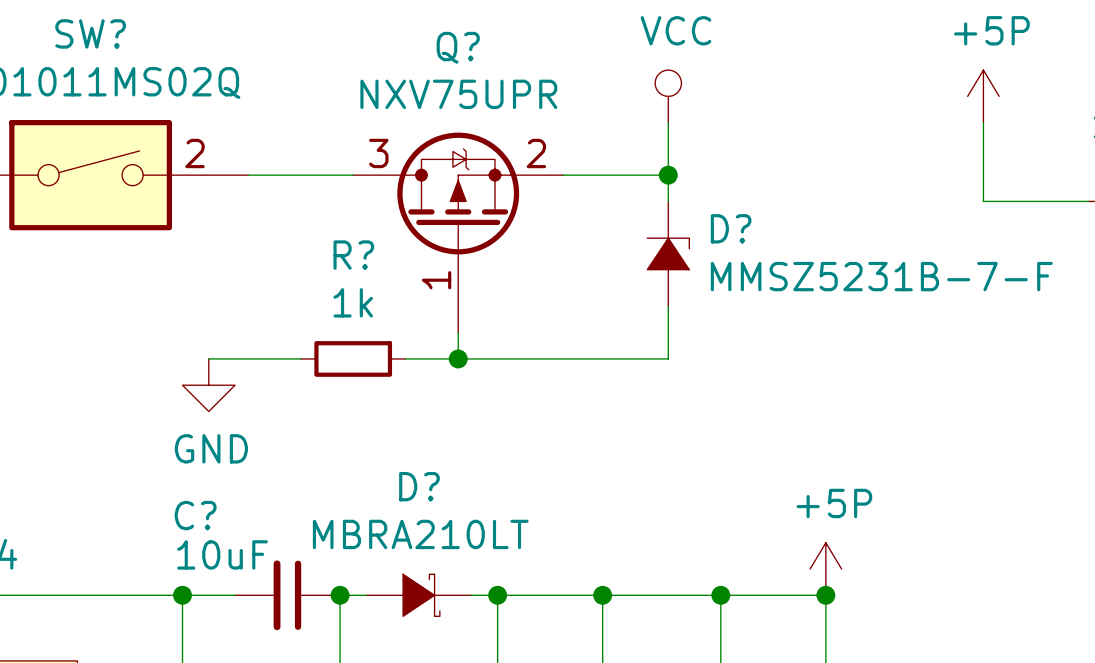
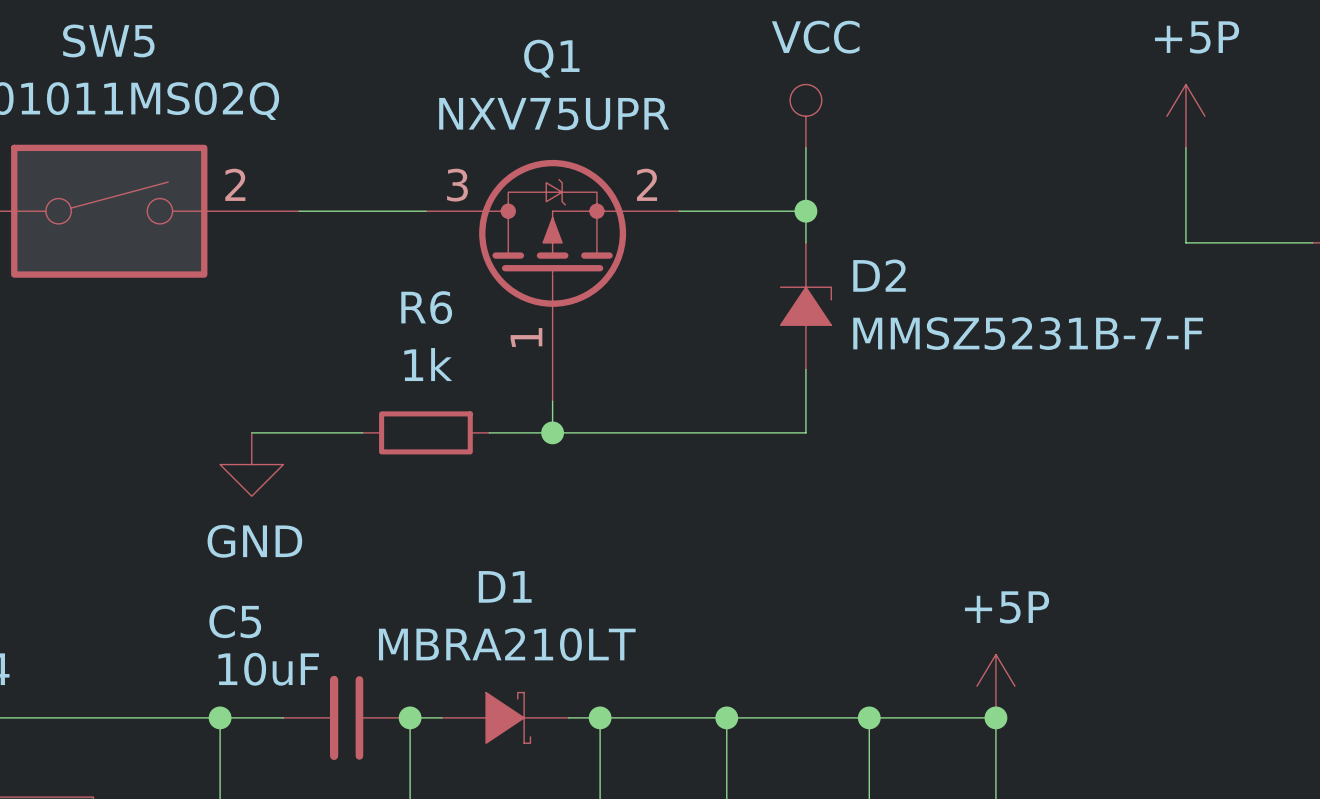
SW? name: SW? (90, 33) -> SW5 (108, 40)
Q? name: Q? (458, 47) -> Q1 (551, 58)
D? name: D? (731, 228) -> D2 (879, 275)
R? name: R? (353, 255) -> R6 (426, 307)
D? name: D? (419, 486) -> D1 (505, 586)
C? name: C? (195, 515) -> C5 (235, 621)

